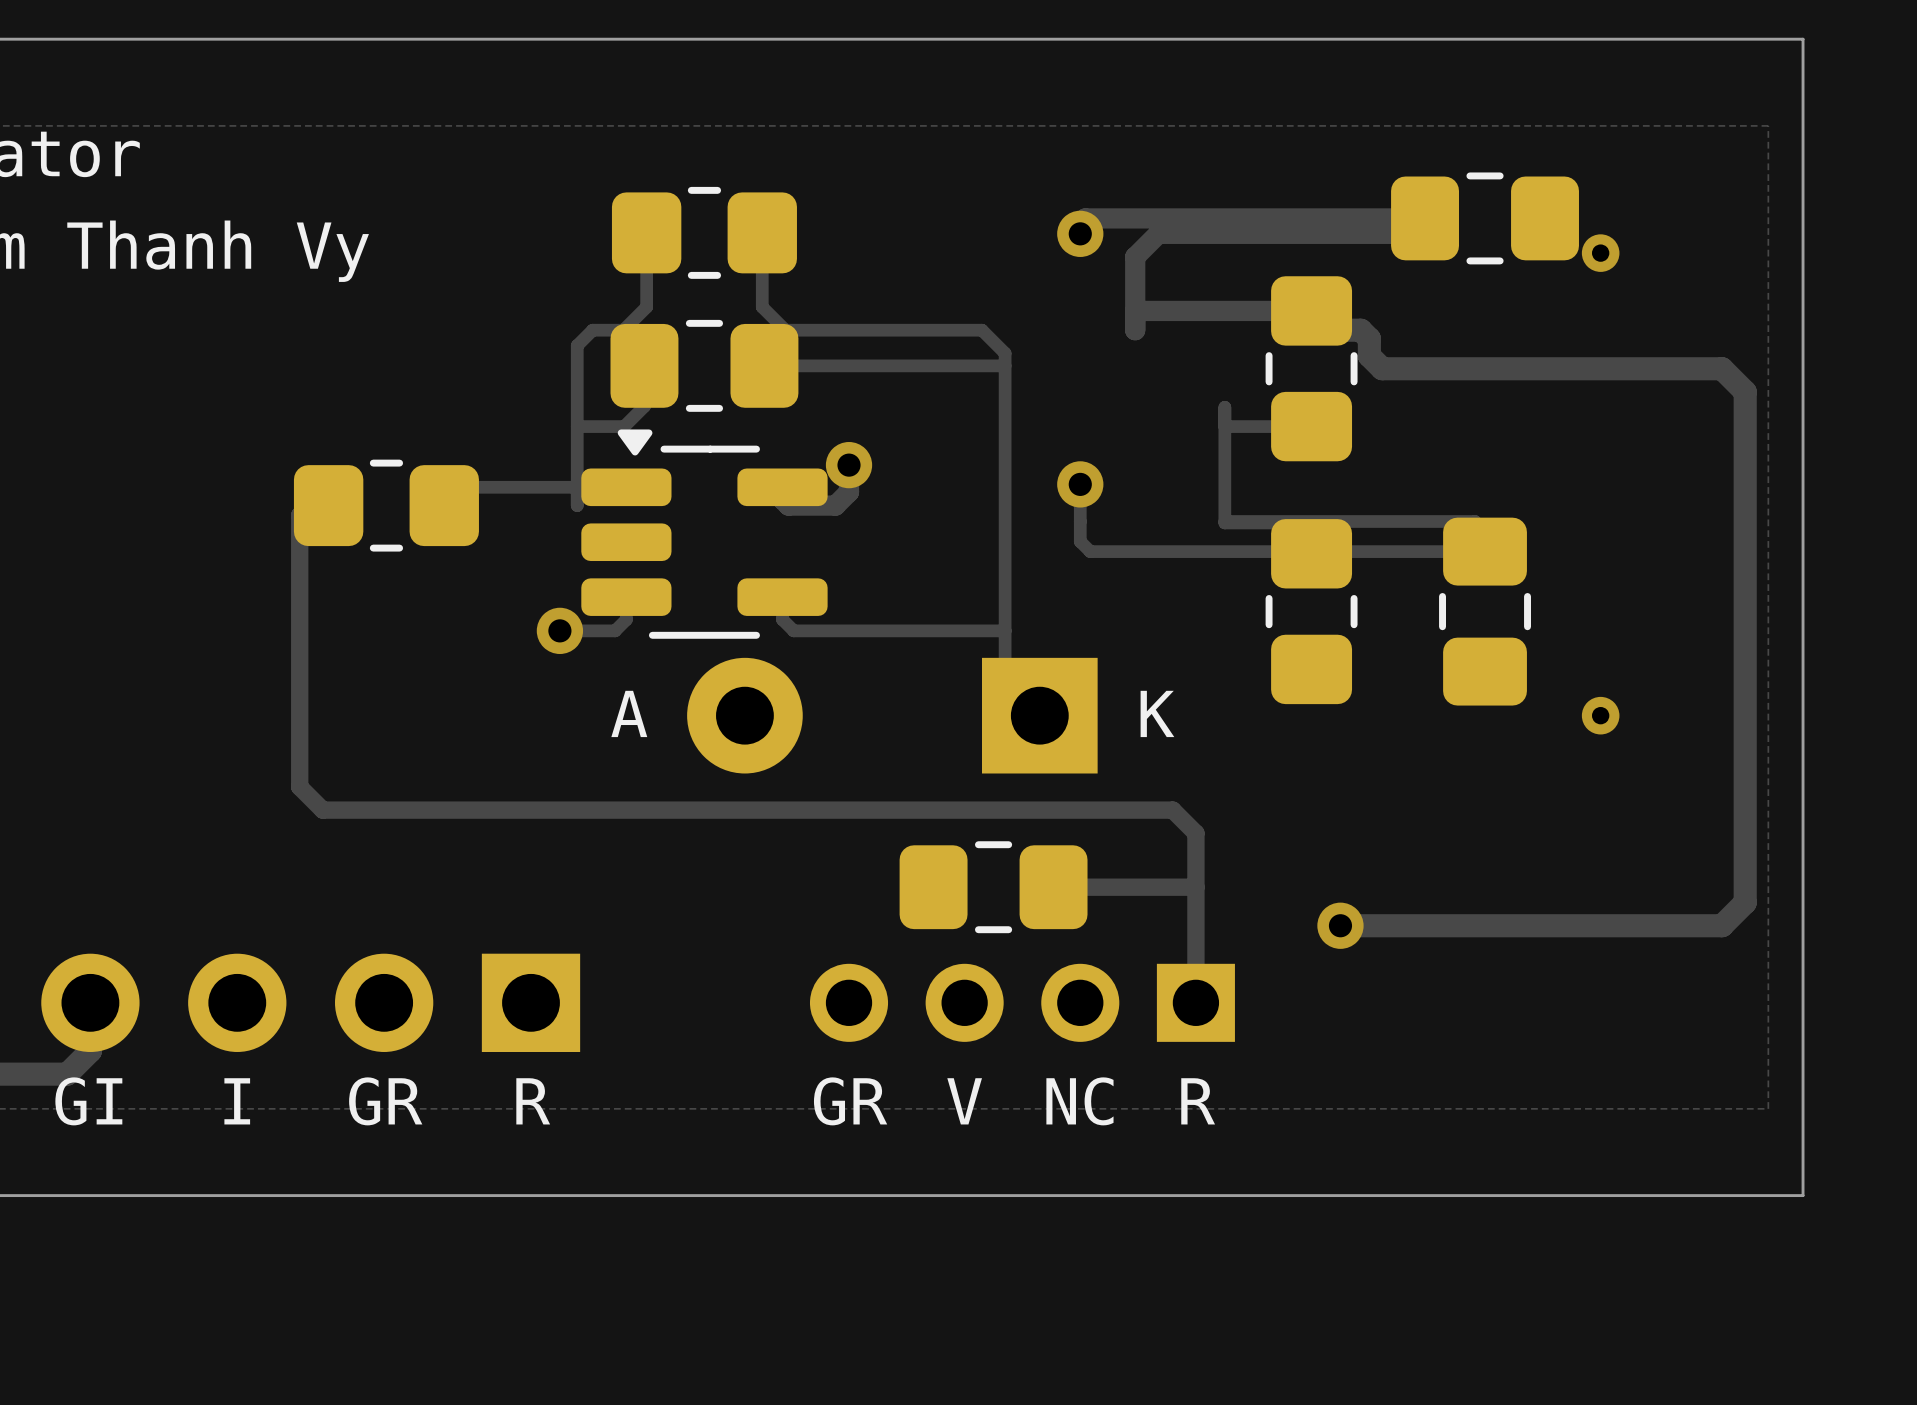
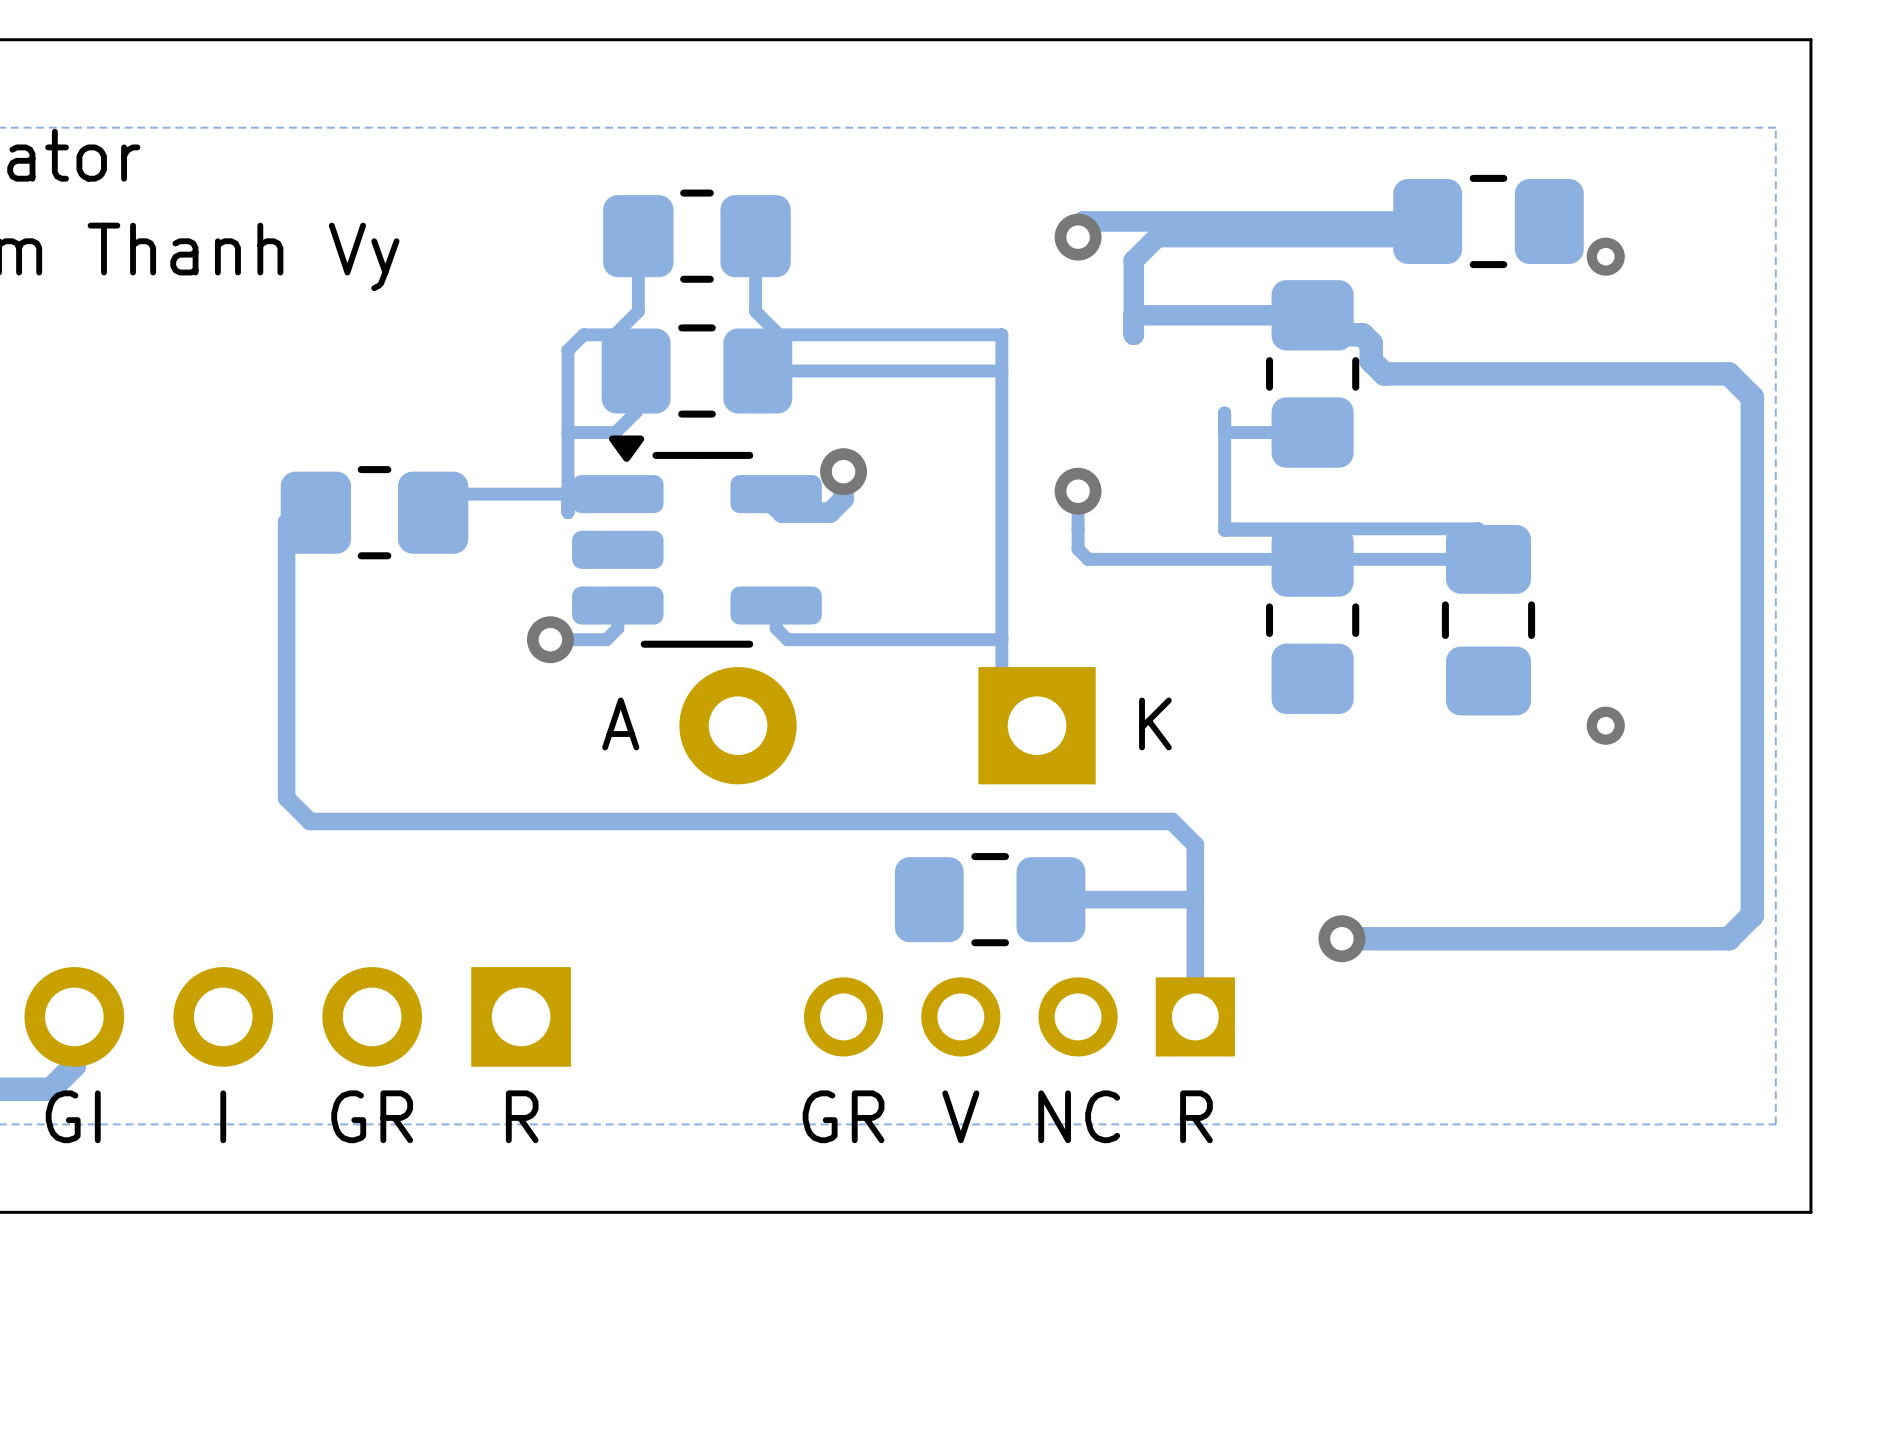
track: (981, 330) (1005, 353) -> (978, 334) (1001, 334) (1001, 358)

